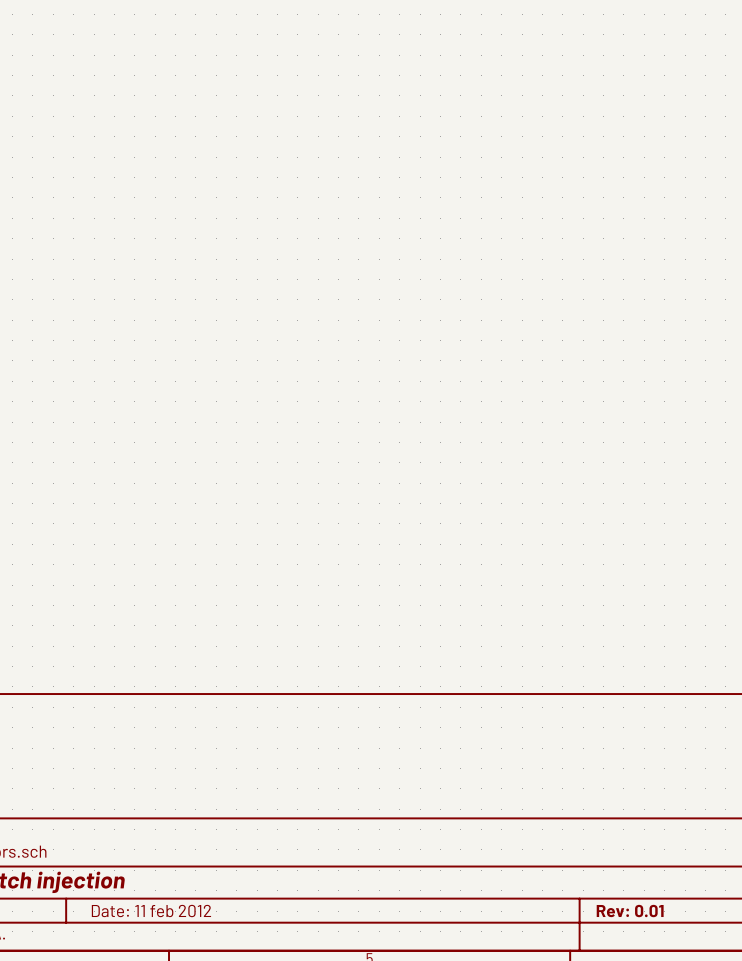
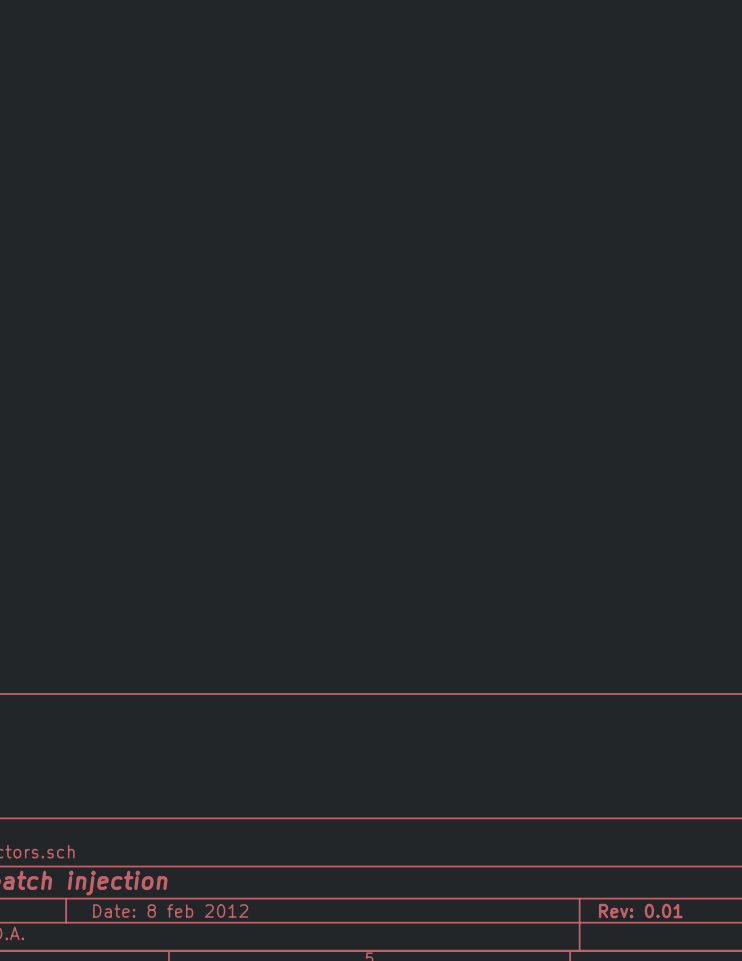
title block: Date: 11 feb 2012 (151, 911) -> Date: 8 feb 2012 (170, 911)

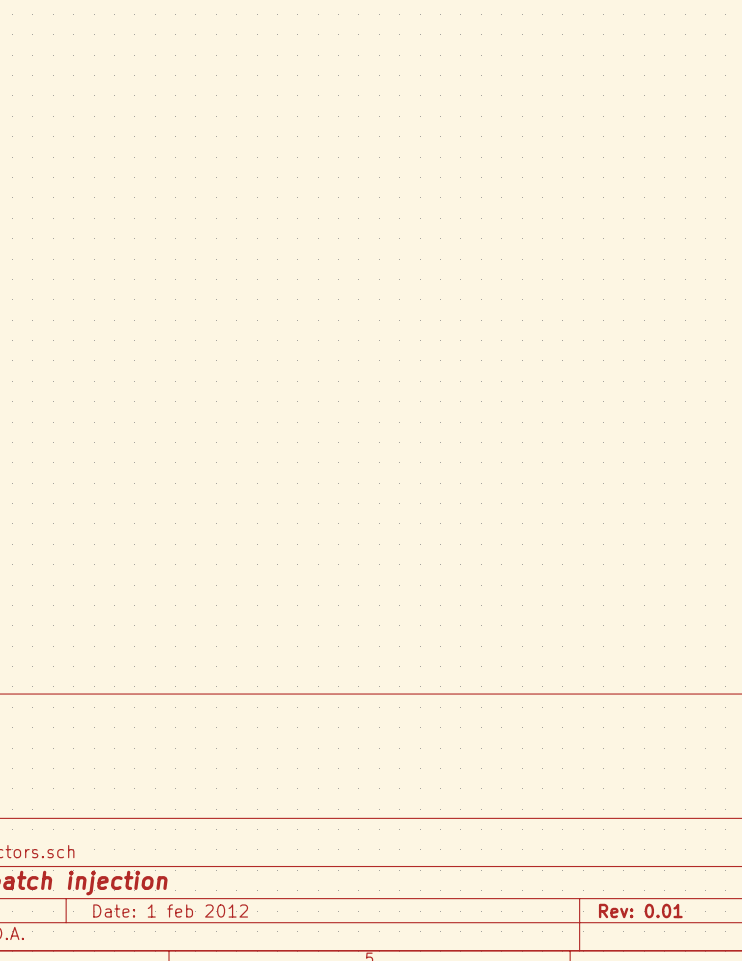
title block: Date: 8 feb 2012 (170, 911) -> Date: 1 feb 2012 (170, 911)

